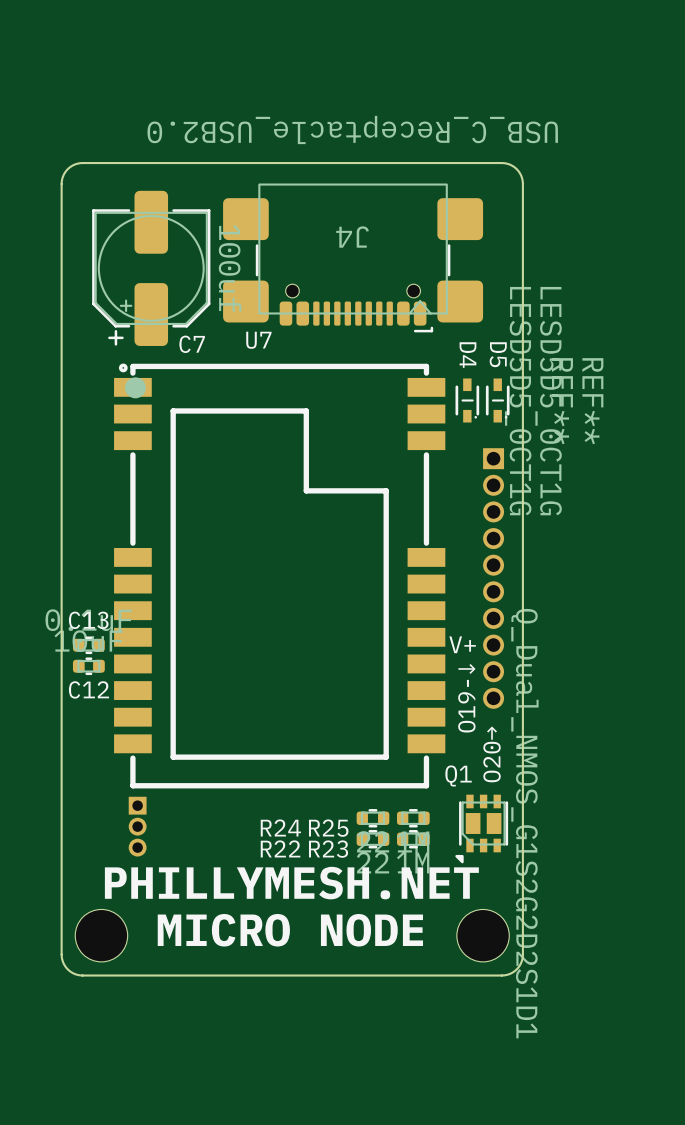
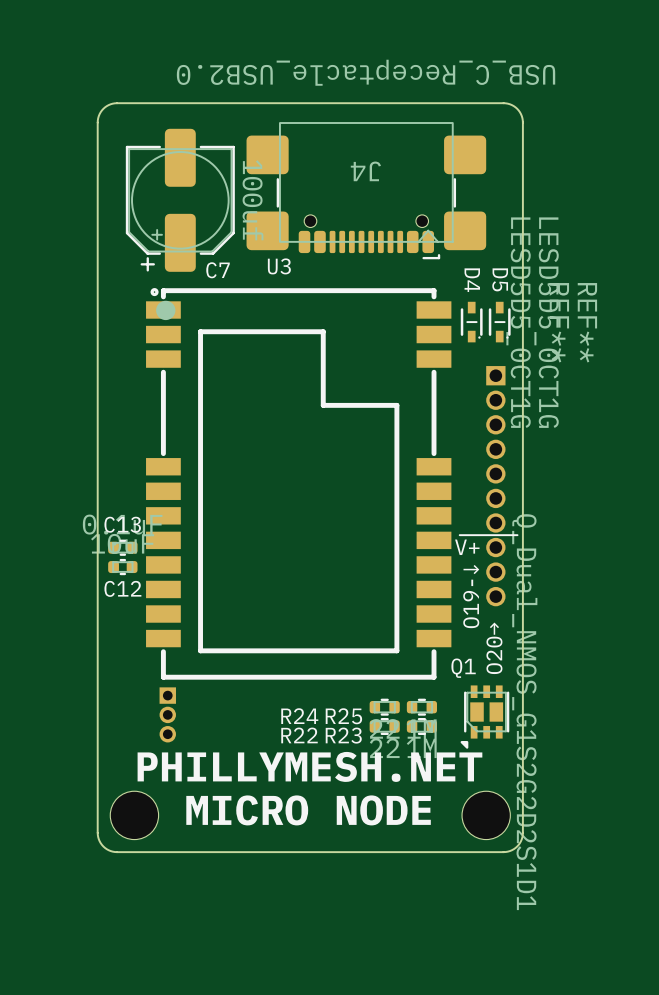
U7 name: U7 (258, 340) -> U3 (279, 266)
line: none -> (517, 535) (459, 535)

